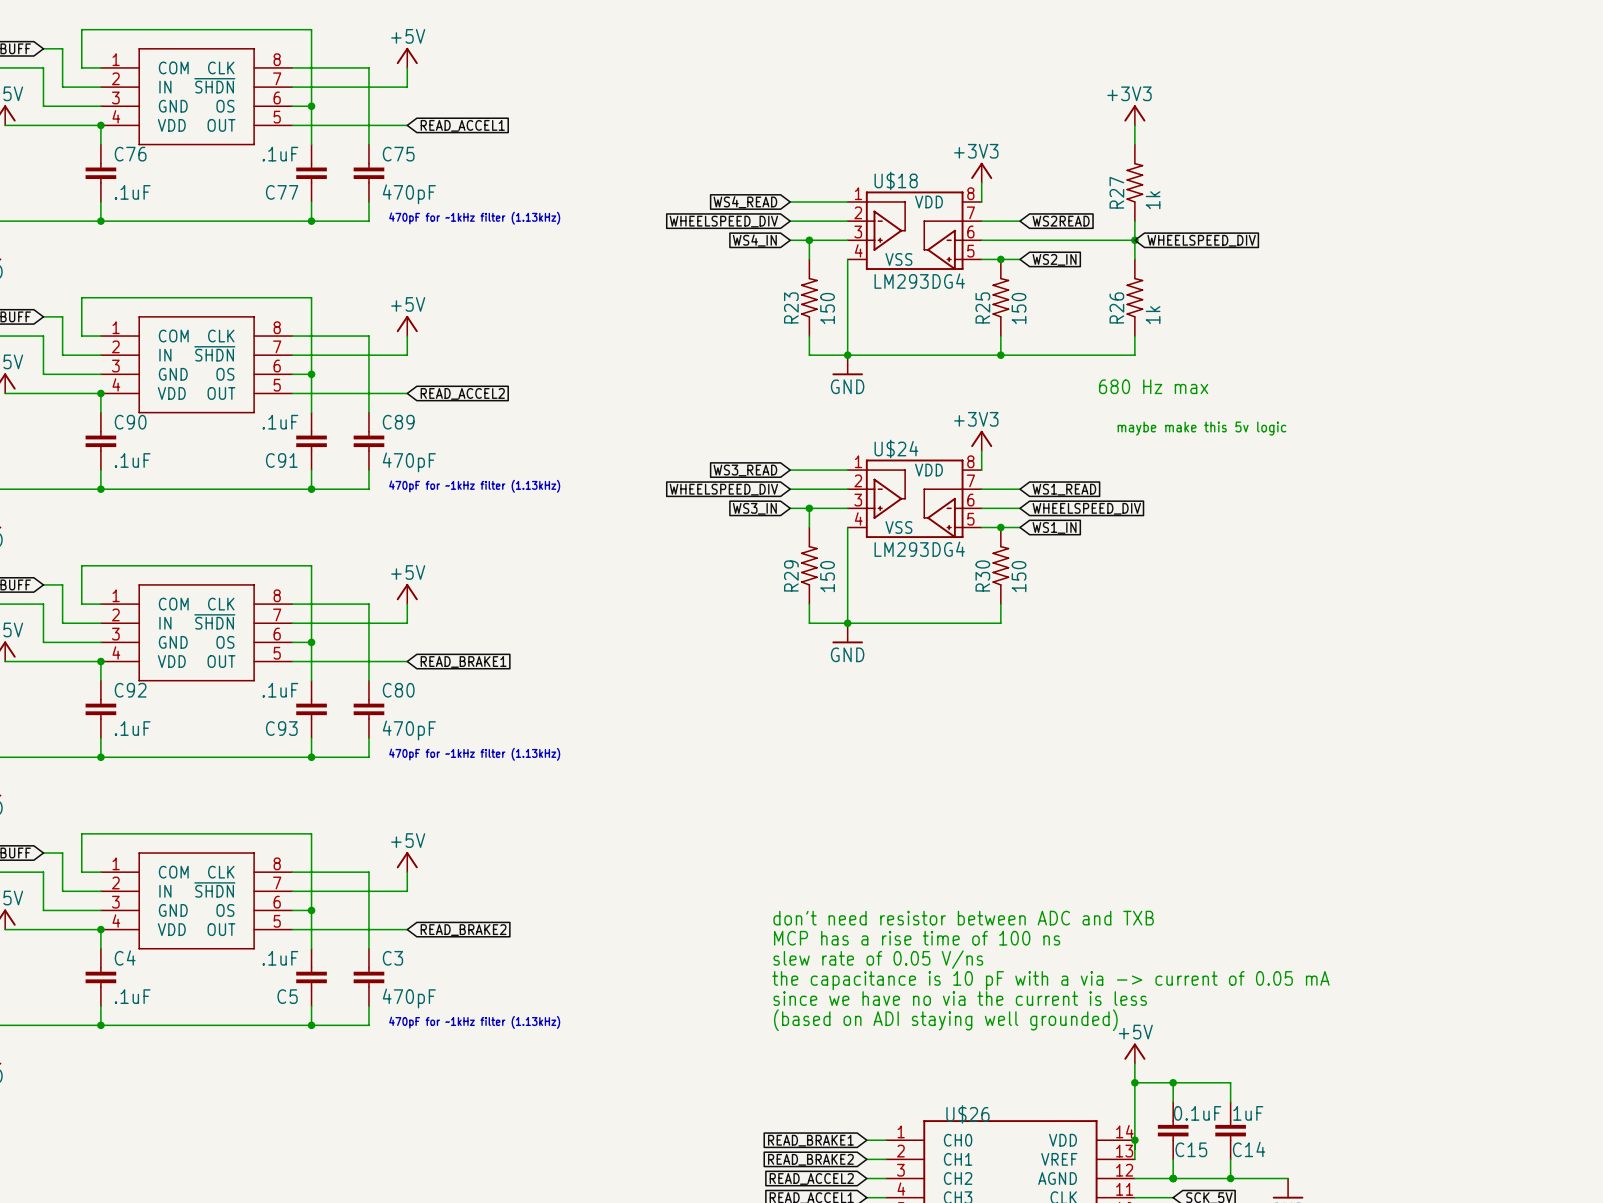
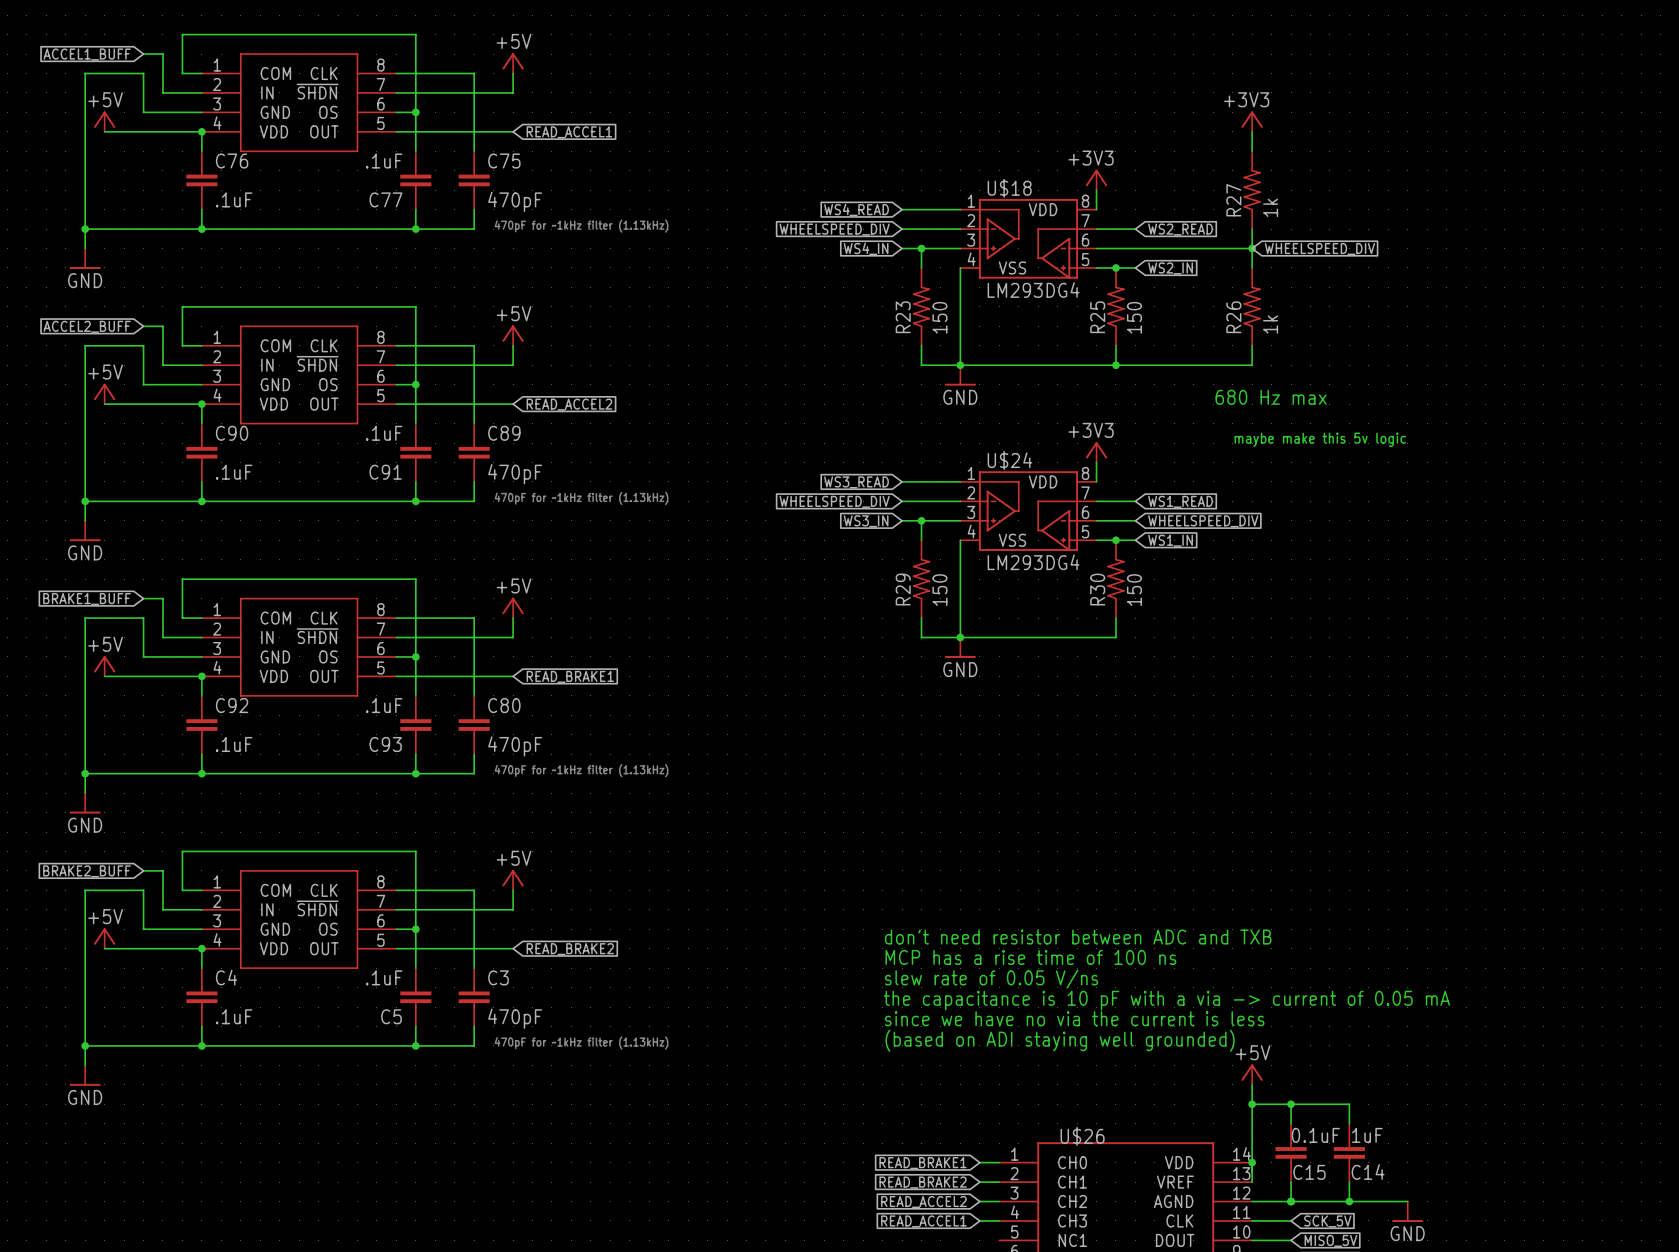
global label: WS2READ (1061, 221) -> WS2_READ (1180, 229)

